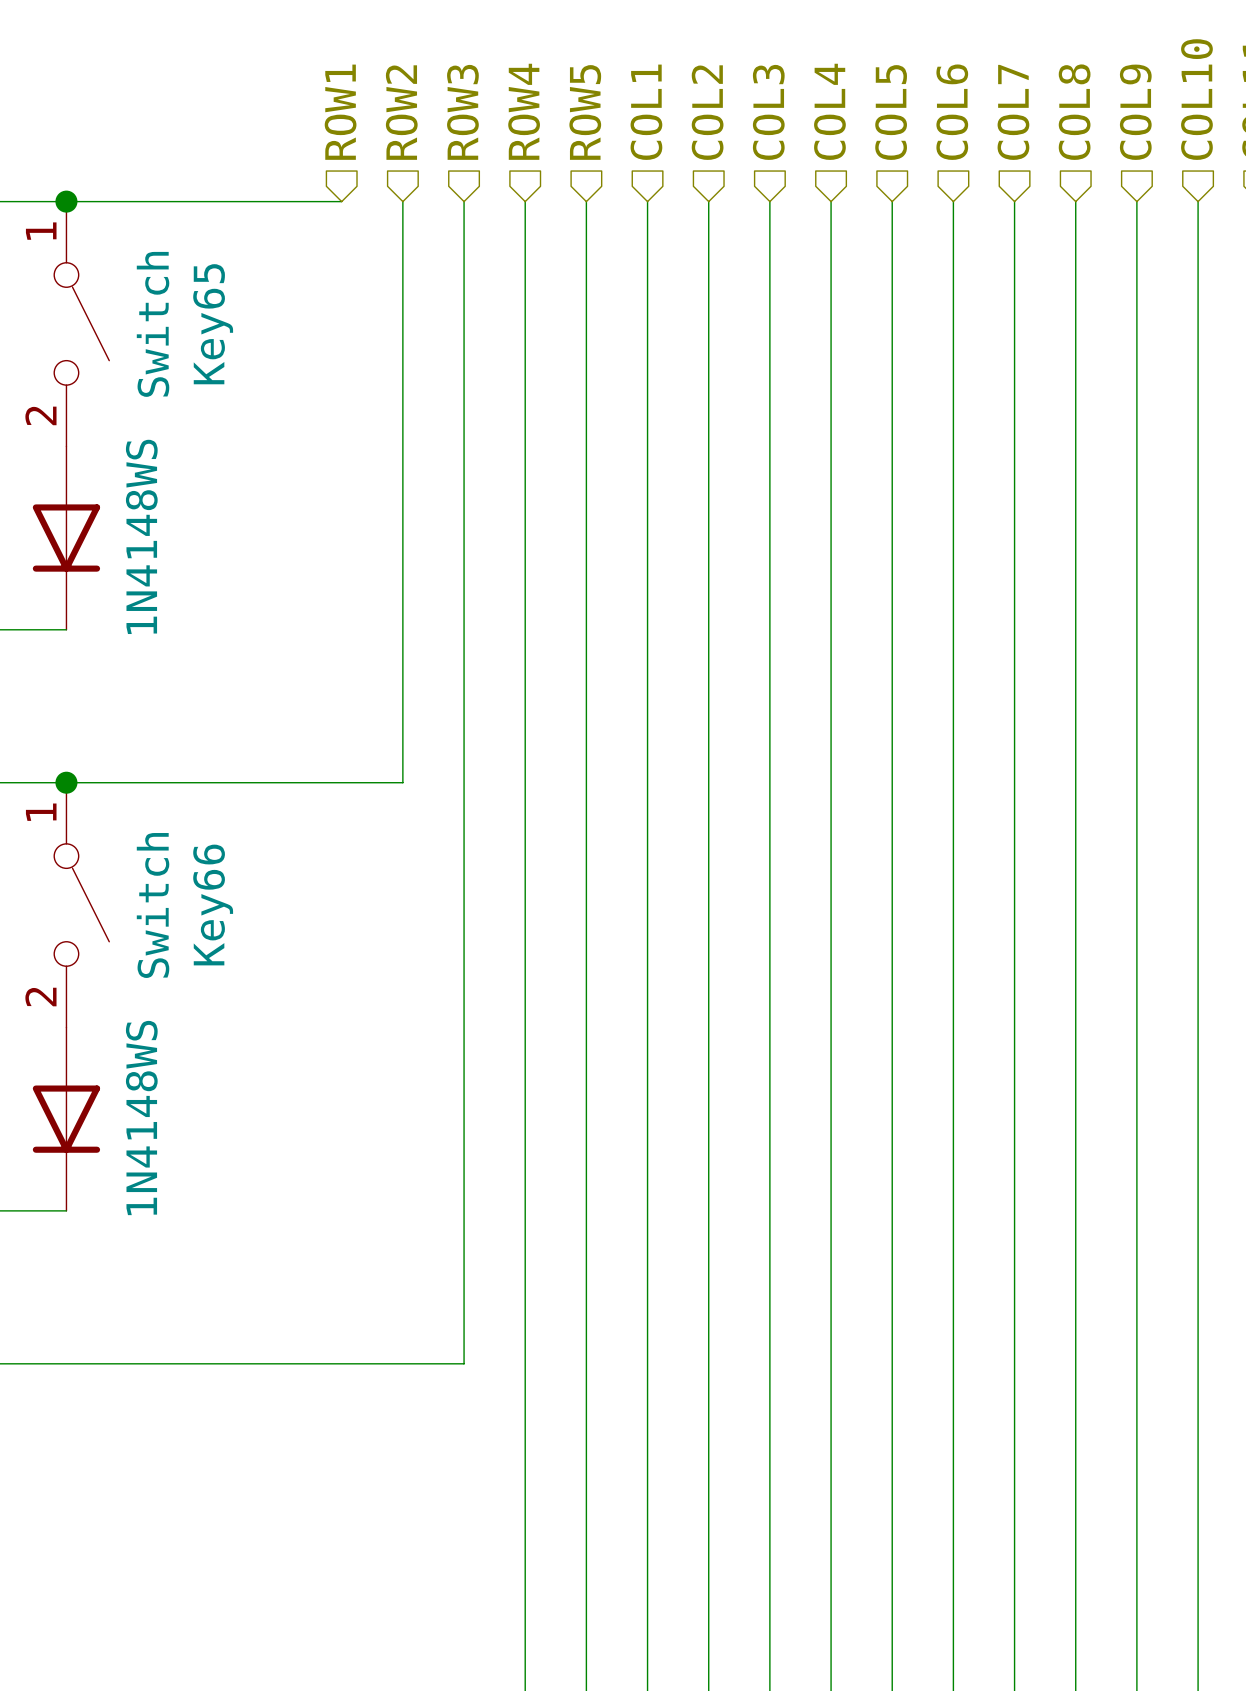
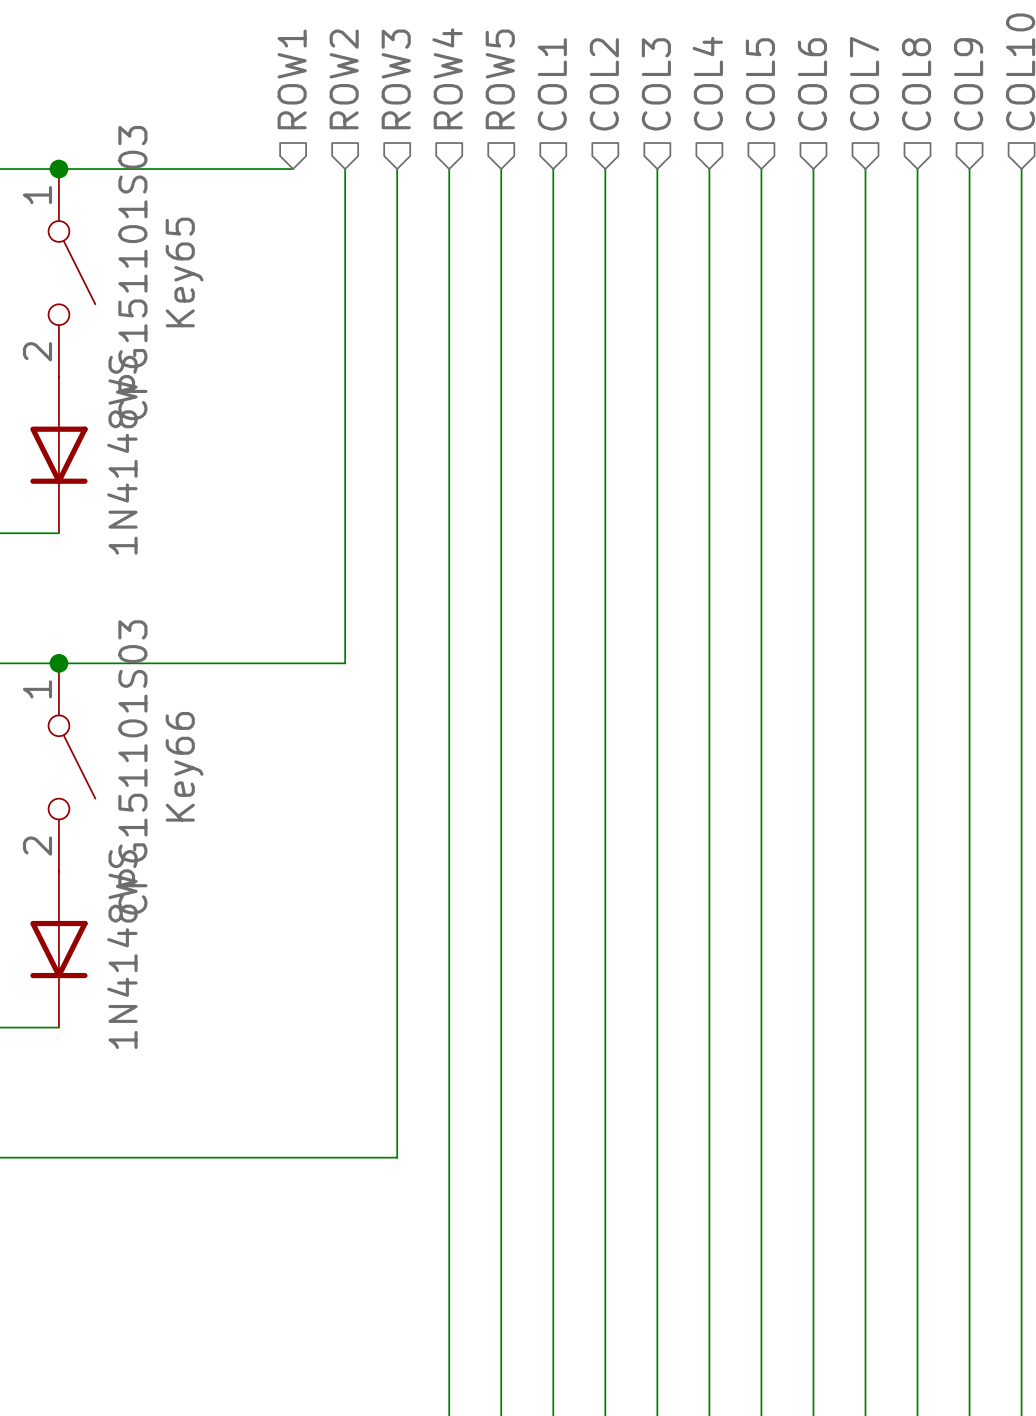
Key65 value: Switch (153, 324) -> CPG151101S03 (132, 273)
Key66 value: Switch (153, 905) -> CPG151101S03 (132, 767)

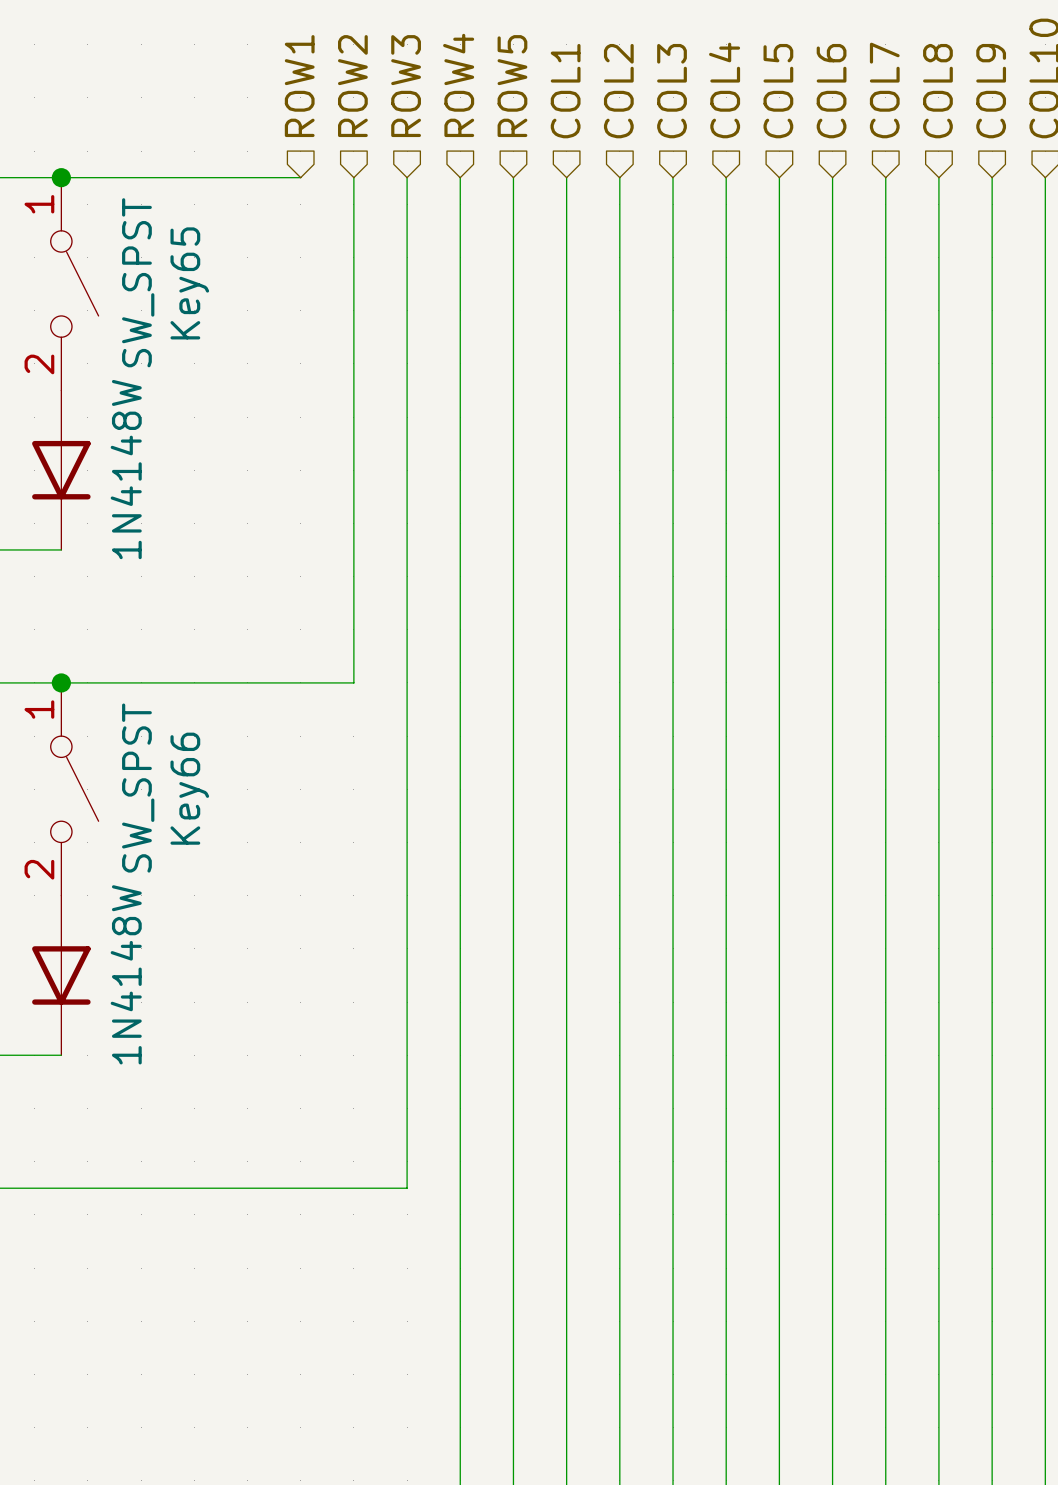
Key65 value: CPG151101S03 (132, 273) -> SW_SPST (138, 282)
part value: 1N4148WS (122, 455) -> 1N4148W (126, 469)
Key66 value: CPG151101S03 (132, 767) -> SW_SPST (138, 788)
part value: 1N4148WS (122, 949) -> 1N4148W (126, 974)

